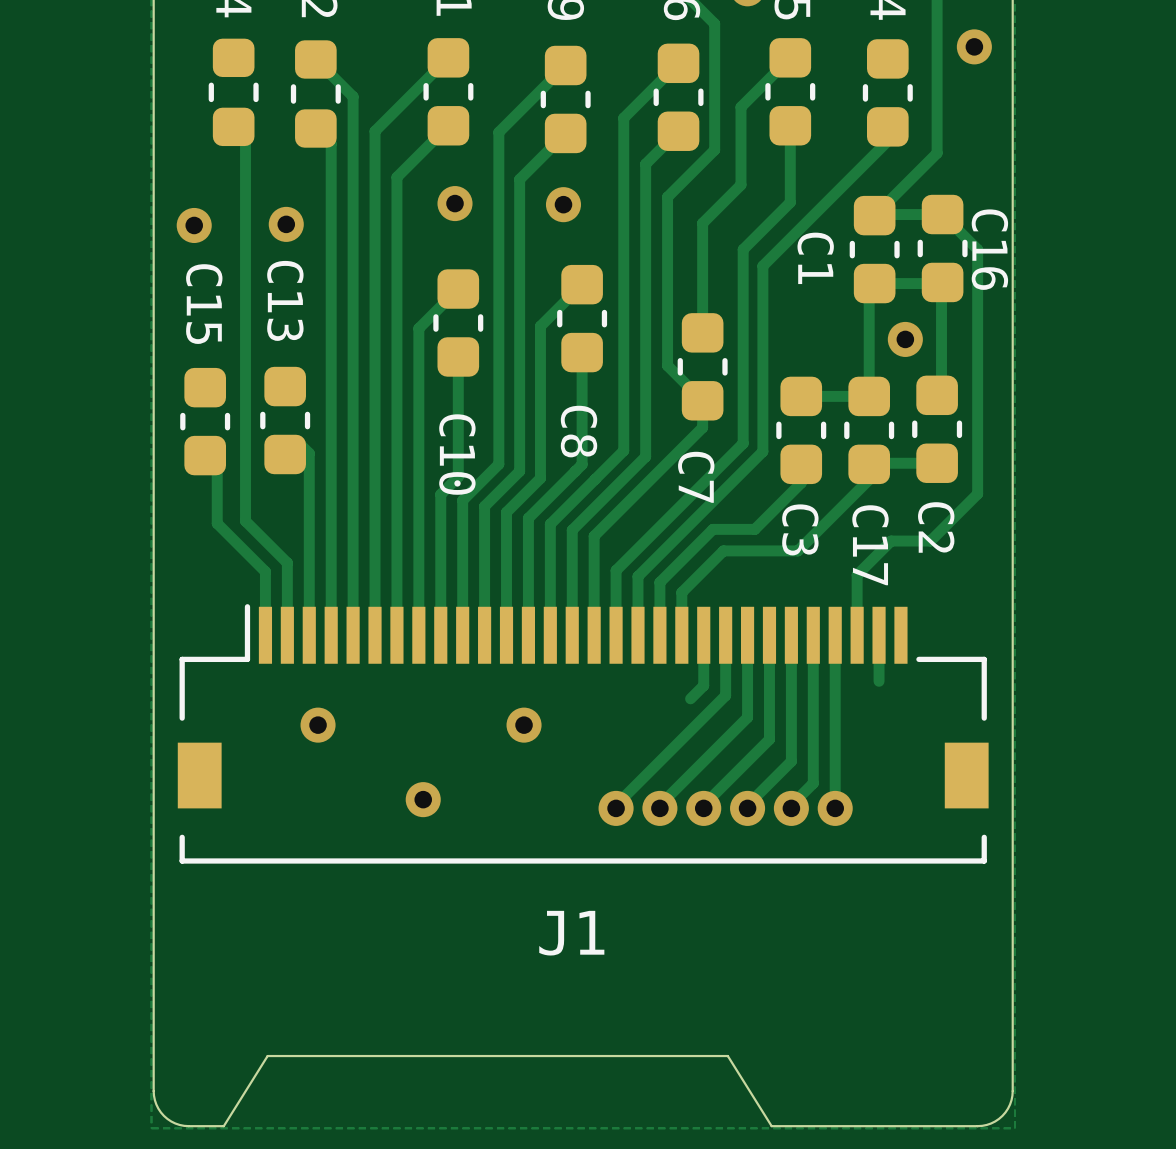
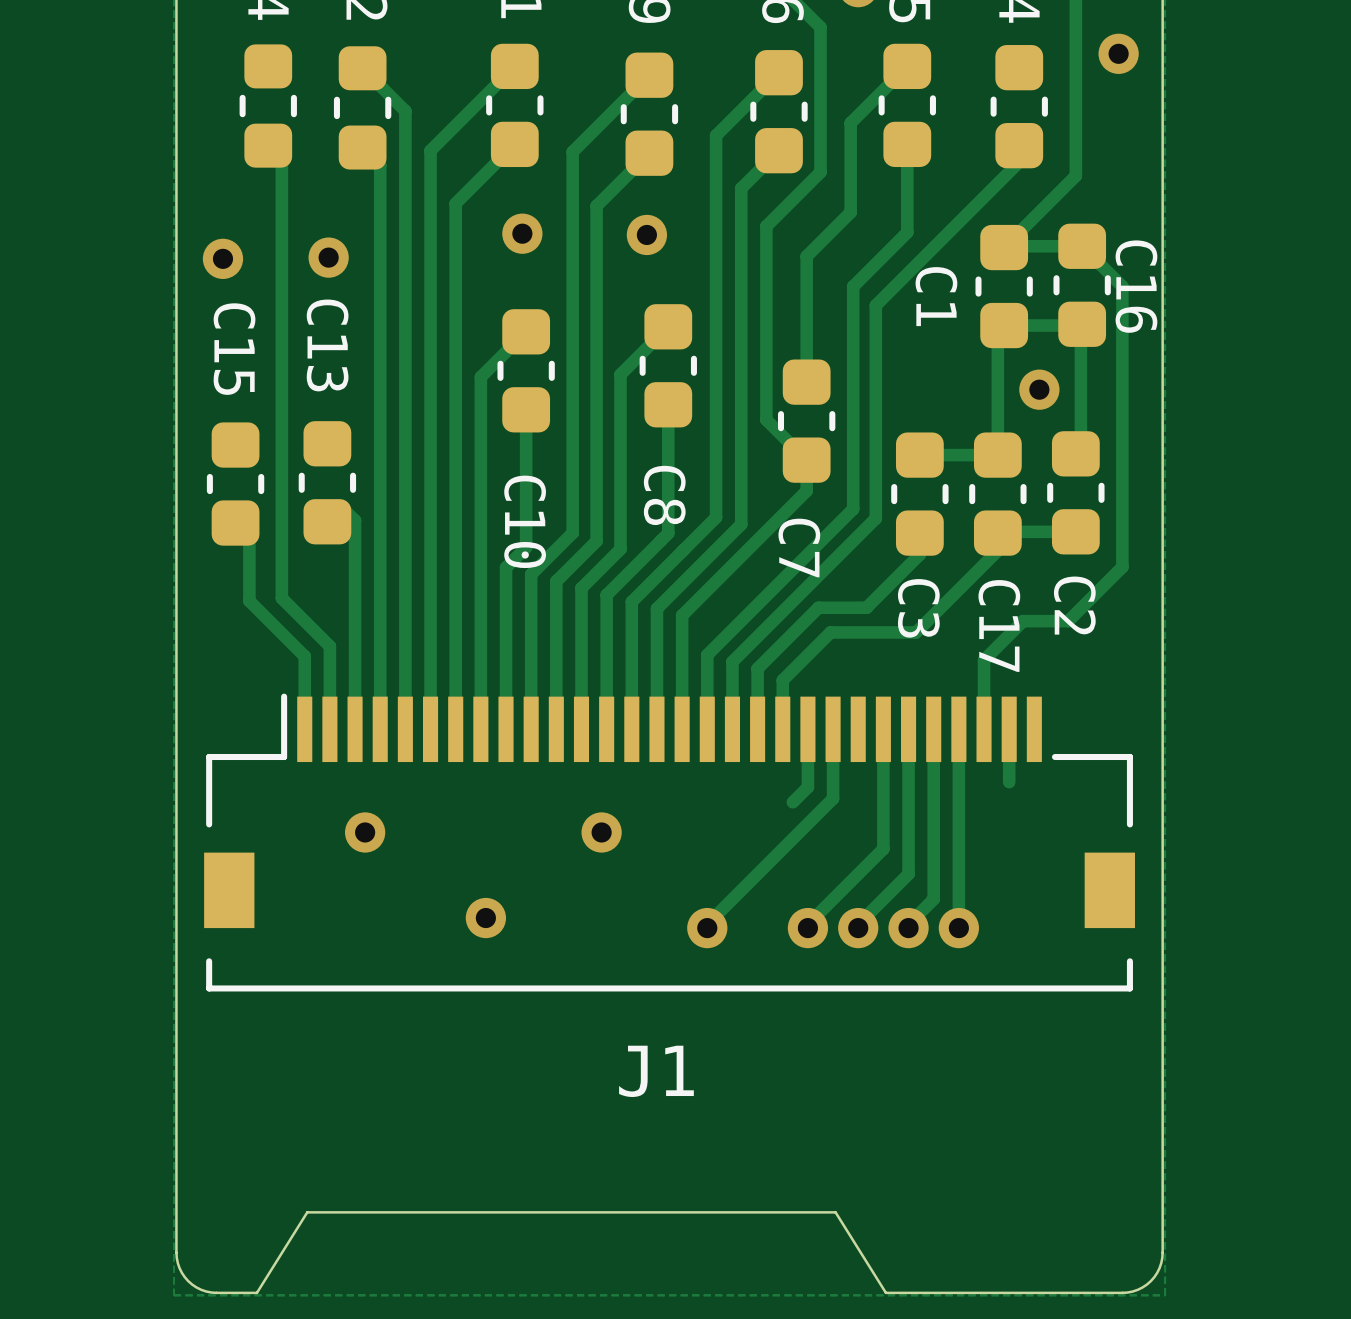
track: (747, 635) (747, 717) (659, 805) (659, 808) -> none
via: (659, 808) -> none

